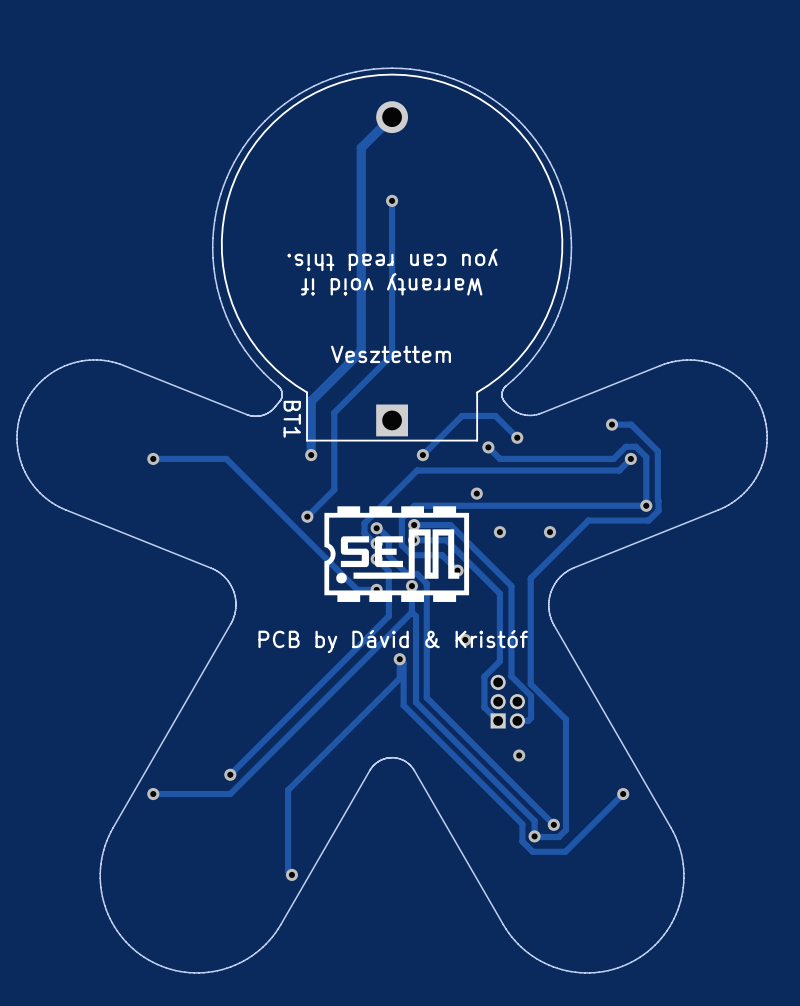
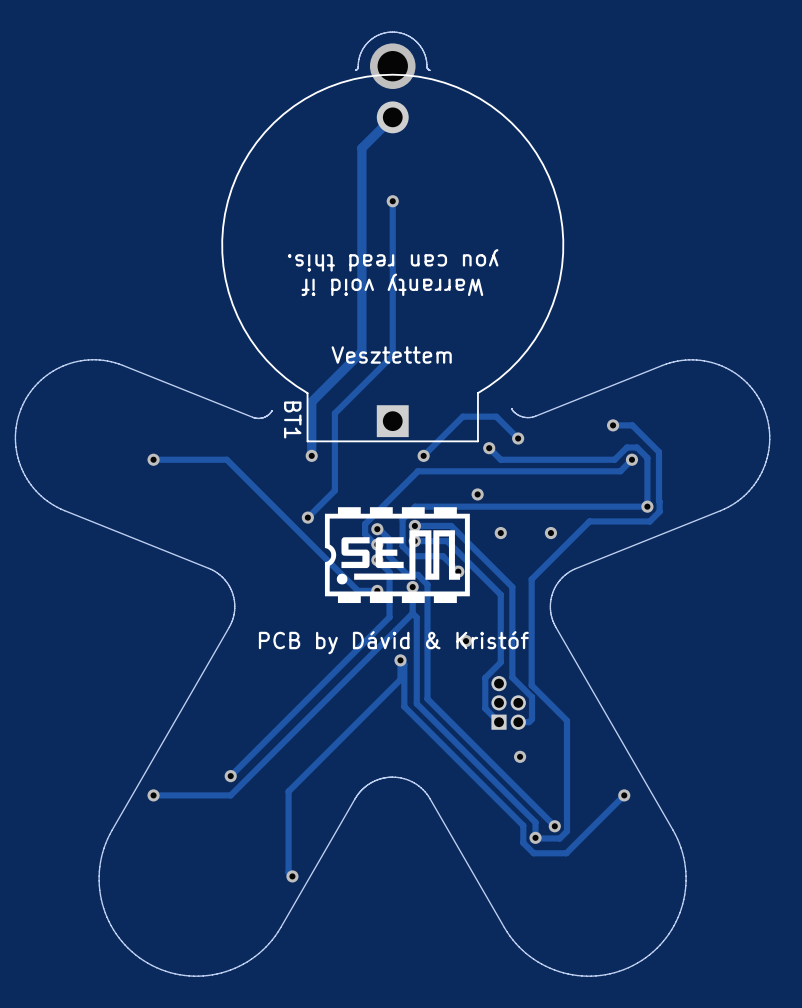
via: none -> (392, 66)
board edge: none -> (426, 66) (424, 53) (416, 42) (405, 34) (392, 32) (379, 34) (368, 42) (360, 53) (358, 66)
board edge: (392, 68) (419, 70) (445, 76) (469, 85) (492, 98) (512, 114) (535, 140) (549, 162) (560, 185) (567, 211) (571, 238) (570, 268) (566, 288) (557, 316) (544, 342) (526, 365) (503, 389) (502, 398) (510, 408) (525, 415) (538, 414) (664, 364) (690, 360) (712, 363) (736, 375) (752, 391) (762, 412) (767, 435) (764, 457) (755, 478) (741, 495) (721, 508) (570, 569) (555, 582) (549, 598) (549, 611) (553, 623) (675, 836) (683, 864) (681, 896) (674, 918) (664, 934) (647, 951) (631, 962) (613, 969) (589, 972) (566, 970) (544, 963) (521, 947) (505, 928) (412, 767) (401, 759) (388, 757) (378, 761) (370, 769) (280, 924) (266, 943) (247, 958) (226, 968) (199, 972) (175, 970) (144, 957) (129, 945) (117, 930) (108, 914) (102, 896) (100, 878) (101, 859) (113, 827) (231, 622) (235, 608) (234, 593) (227, 580) (215, 570) (65, 509) (45, 498) (30, 481) (20, 461) (17, 439) (19, 420) (27, 398) (45, 377) (67, 364) (93, 359) (119, 364) (249, 415) (261, 415) (272, 409) (281, 399) (281, 390) (257, 365) (239, 342) (226, 316) (217, 288) (213, 268) (212, 238) (216, 211) (223, 185) (234, 162) (248, 140) (271, 114) (291, 98) (314, 85) (338, 76) (364, 70) (392, 68) -> none
board edge: none -> (511, 409) (520, 416) (534, 416) (666, 364) (681, 360) (696, 360) (722, 366) (744, 380) (760, 401) (768, 424) (769, 443) (764, 465) (754, 485) (740, 498) (720, 510) (572, 570) (558, 581) (551, 595) (550, 610) (554, 625) (675, 834) (685, 866) (685, 885) (682, 904) (676, 921) (666, 937) (653, 951) (637, 963) (605, 974) (581, 975) (559, 971) (537, 961) (522, 950) (506, 931) (426, 794) (411, 781) (395, 777) (375, 780) (359, 792) (278, 931) (262, 950) (243, 964) (226, 971) (207, 975) (189, 975) (170, 972) (139, 957) (124, 944) (113, 929) (103, 908) (99, 885) (100, 862) (105, 843) (230, 625) (234, 612) (234, 599) (227, 583) (213, 570) (64, 510) (44, 498) (28, 481) (19, 461) (15, 439) (18, 416) (28, 394) (46, 375) (69, 363) (92, 359) (118, 363) (253, 417) (263, 417) (271, 411)

